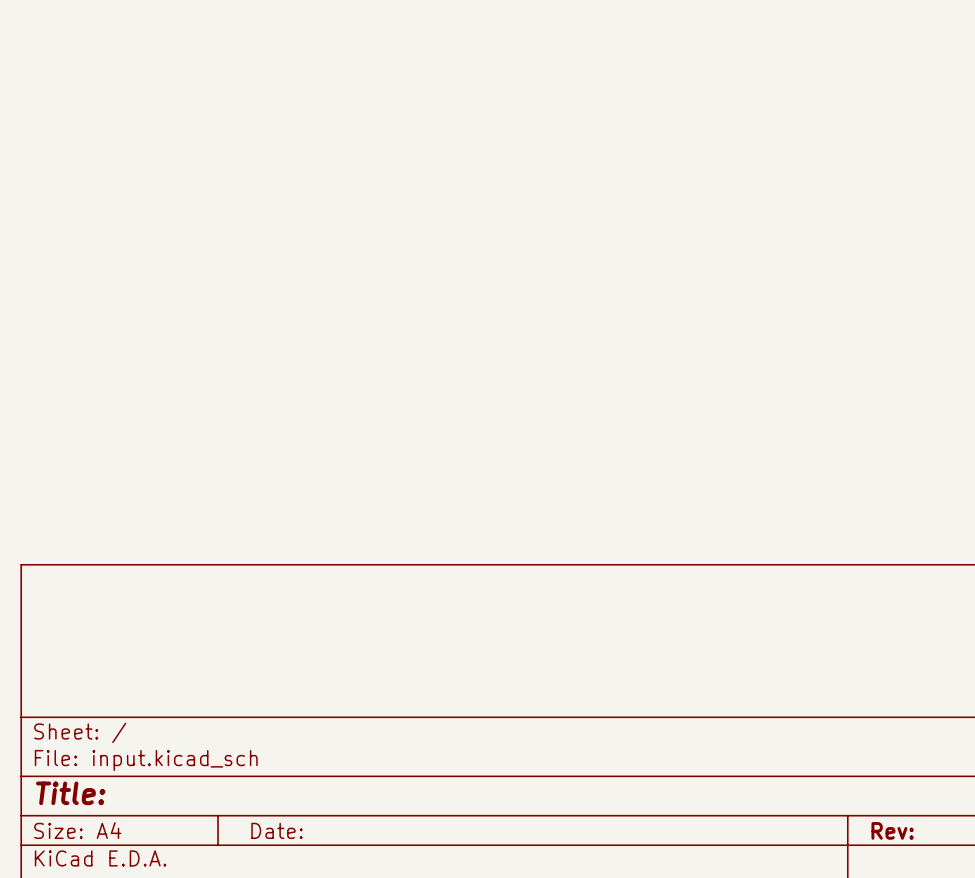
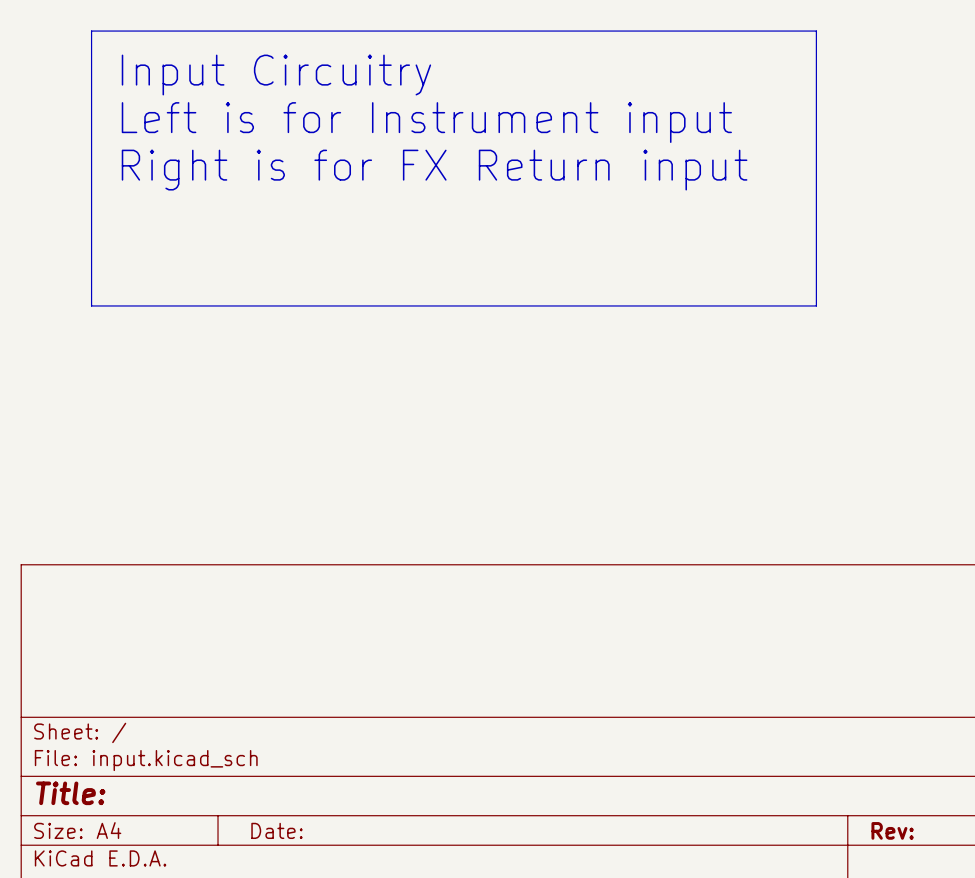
line: none -> (91, 31) (816, 31) (816, 305) (91, 305) (91, 31)
text: none -> Input Circuitry (276, 75)
text: none -> Left is for Instrument input (426, 122)
text: none -> Right is for FX Return input (434, 170)

